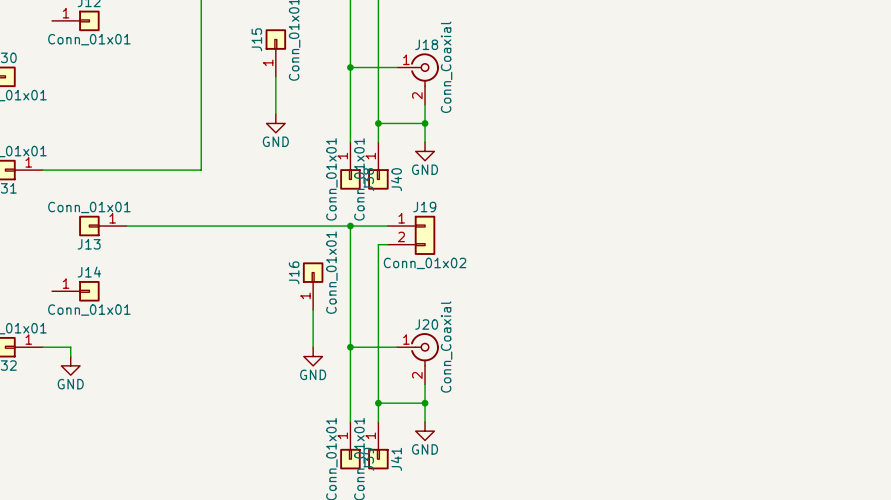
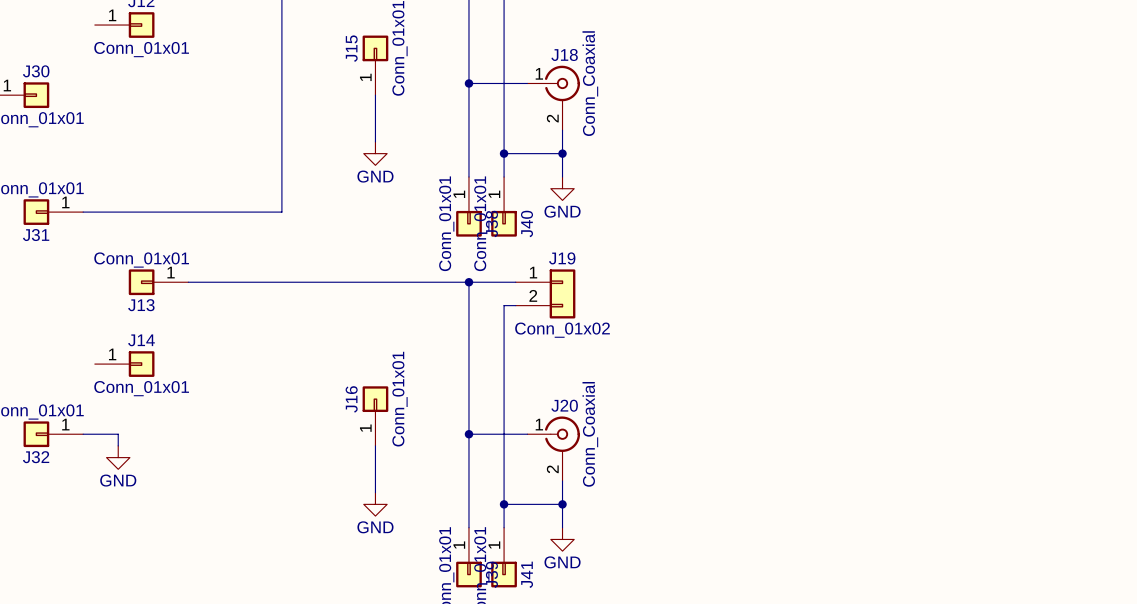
J16 position: (313, 286) -> (375, 416)
wire: (313, 309) (313, 347) -> (375, 445) (375, 492)
power symbol position: GND (313, 356) -> GND (375, 504)

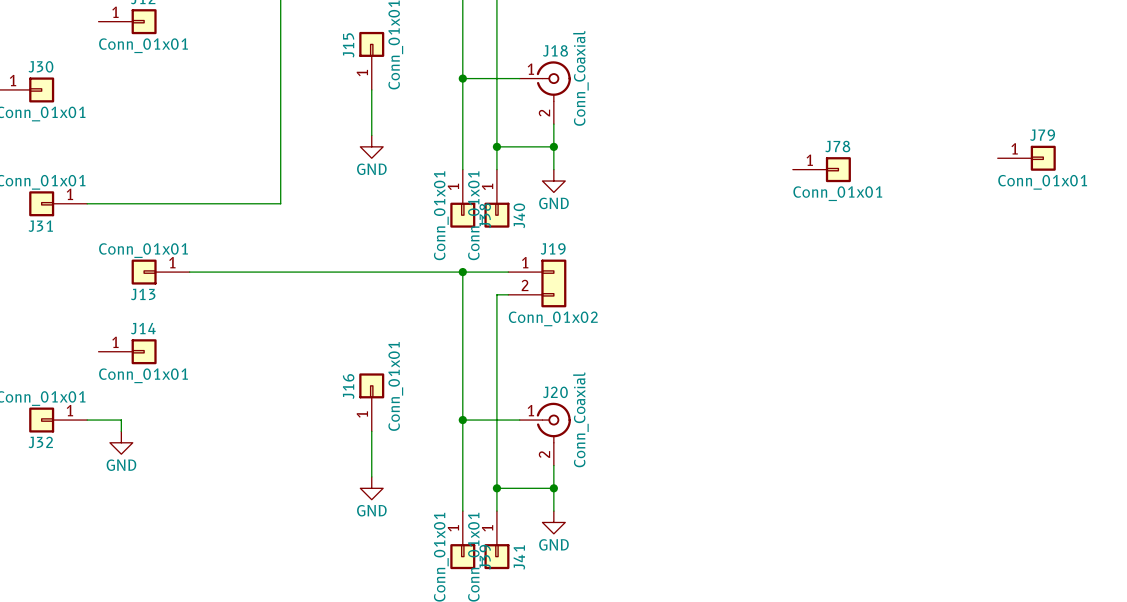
J79: none -> Conn_01x01 (1026, 158)
J78: none -> Conn_01x01 (821, 169)

